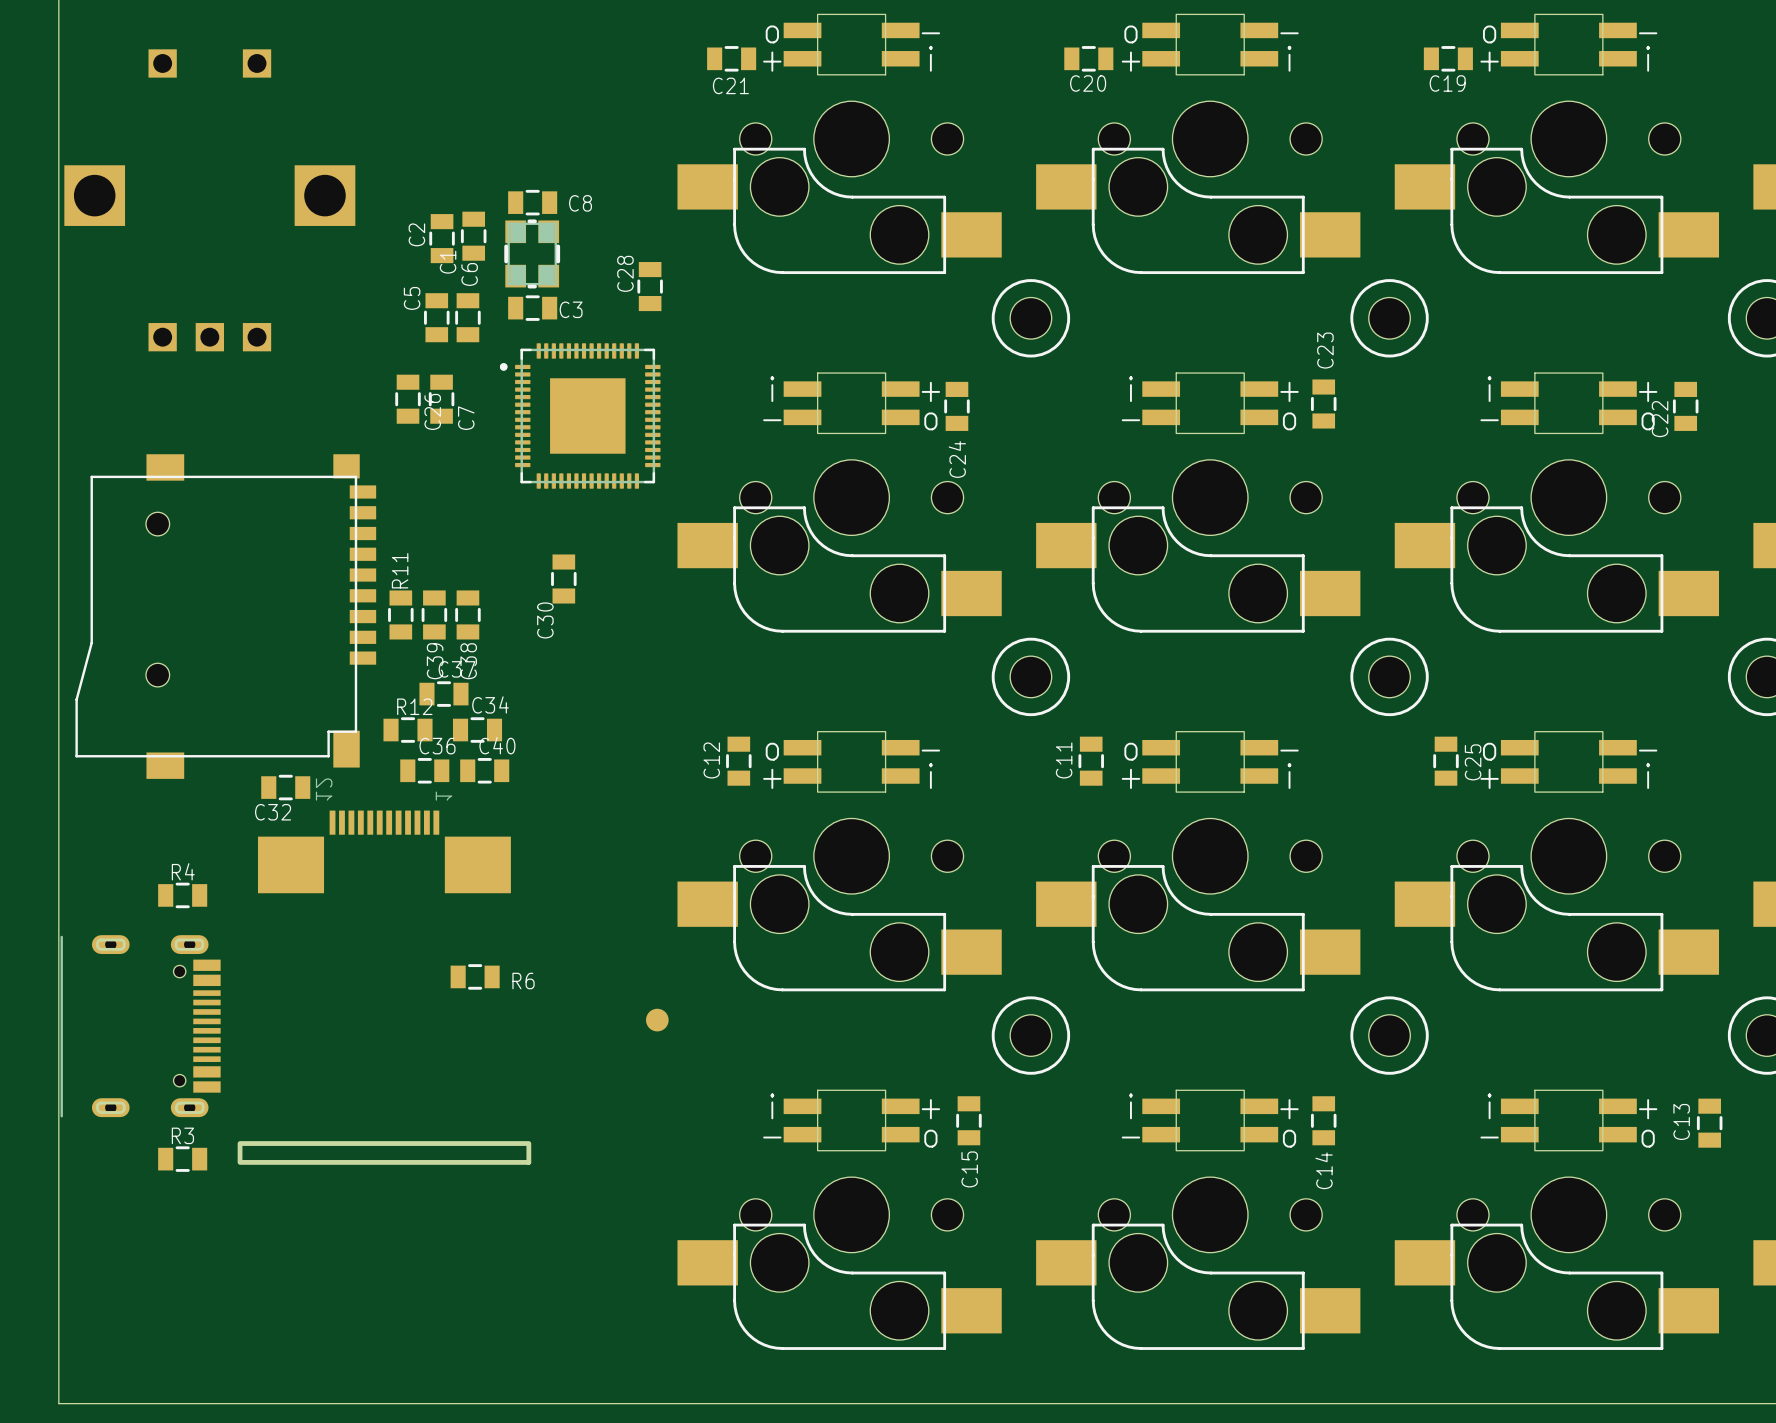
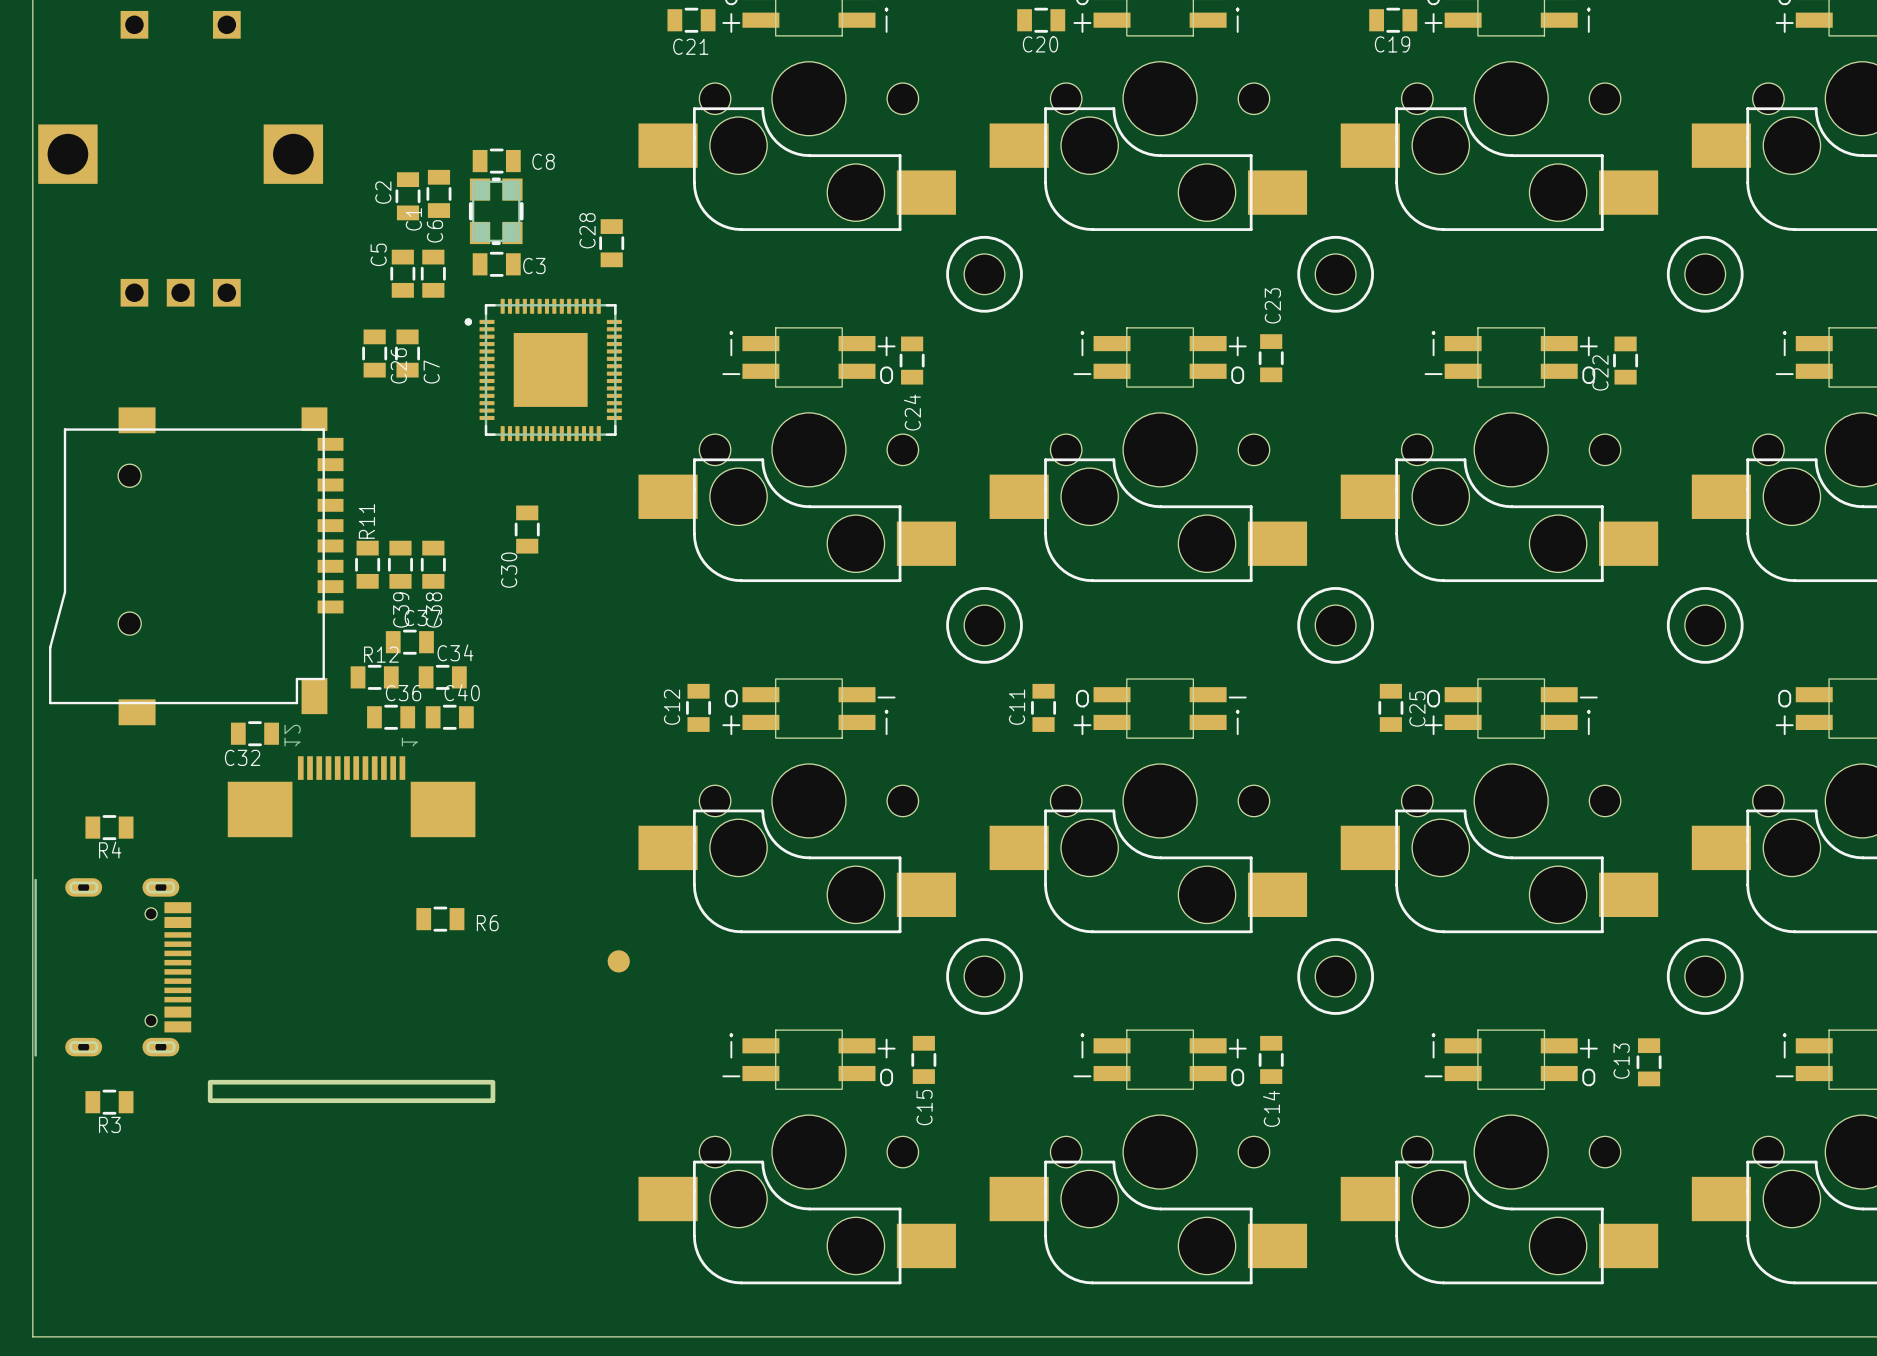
R4 name position: R4 (183, 871) -> R4 (110, 850)
R4 position: (182, 895) -> (109, 827)
R3 name position: R3 (182, 1135) -> R3 (109, 1124)
R3 position: (182, 1159) -> (109, 1102)

